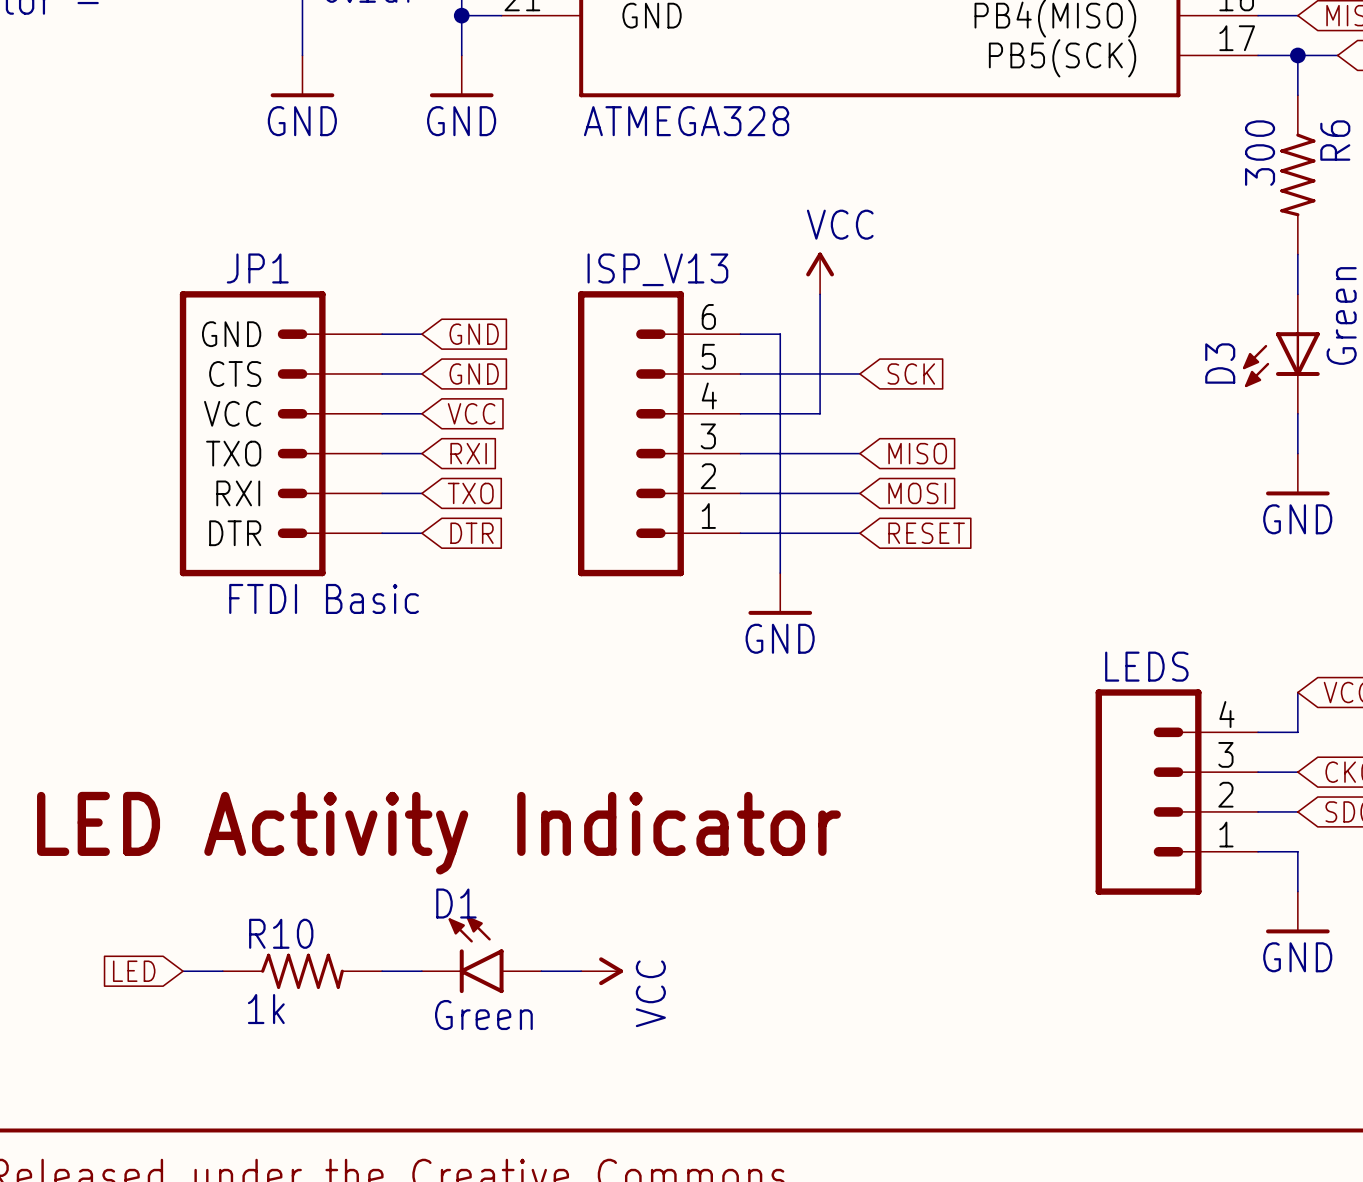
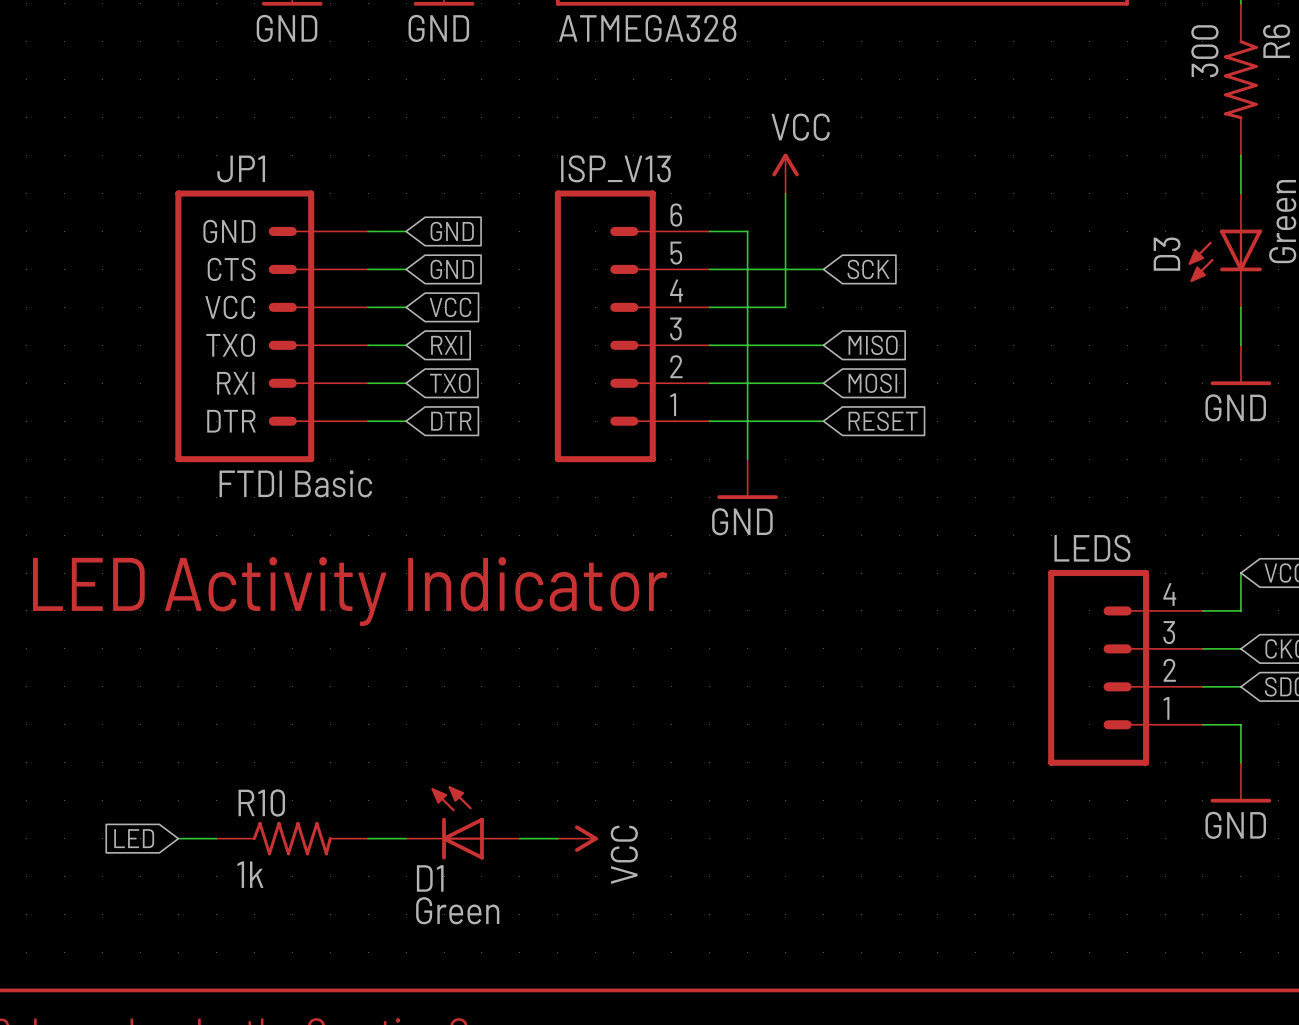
text position: LED Activity Indicator (438, 833) -> LED Activity Indicator (350, 591)
D1 name position: D1 (456, 903) -> D1 (430, 878)
D1 symbol: [421, 916, 542, 994] -> [406, 786, 520, 860]
D1 value position: Green (483, 1015) -> Green (457, 910)

